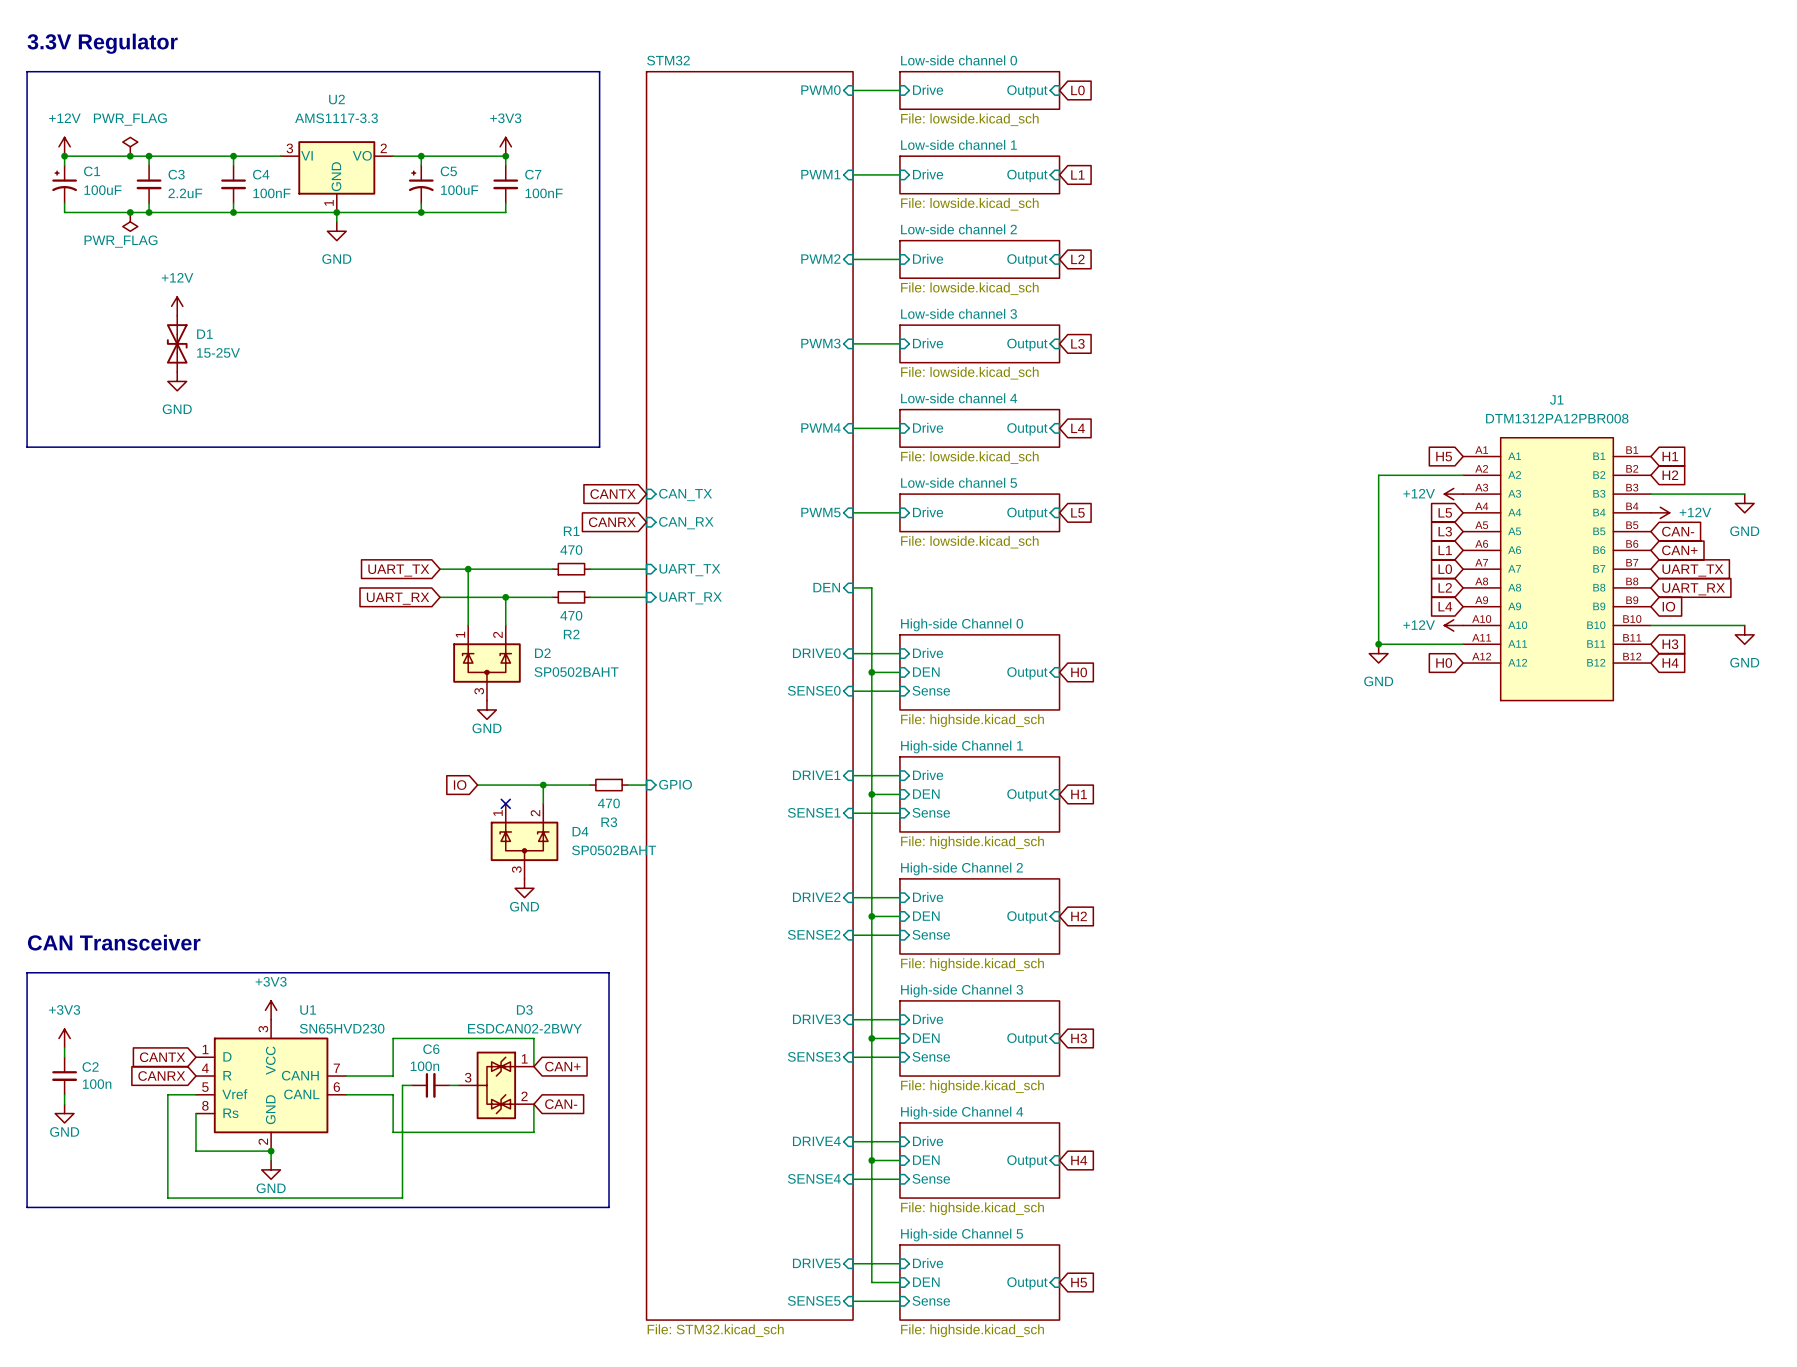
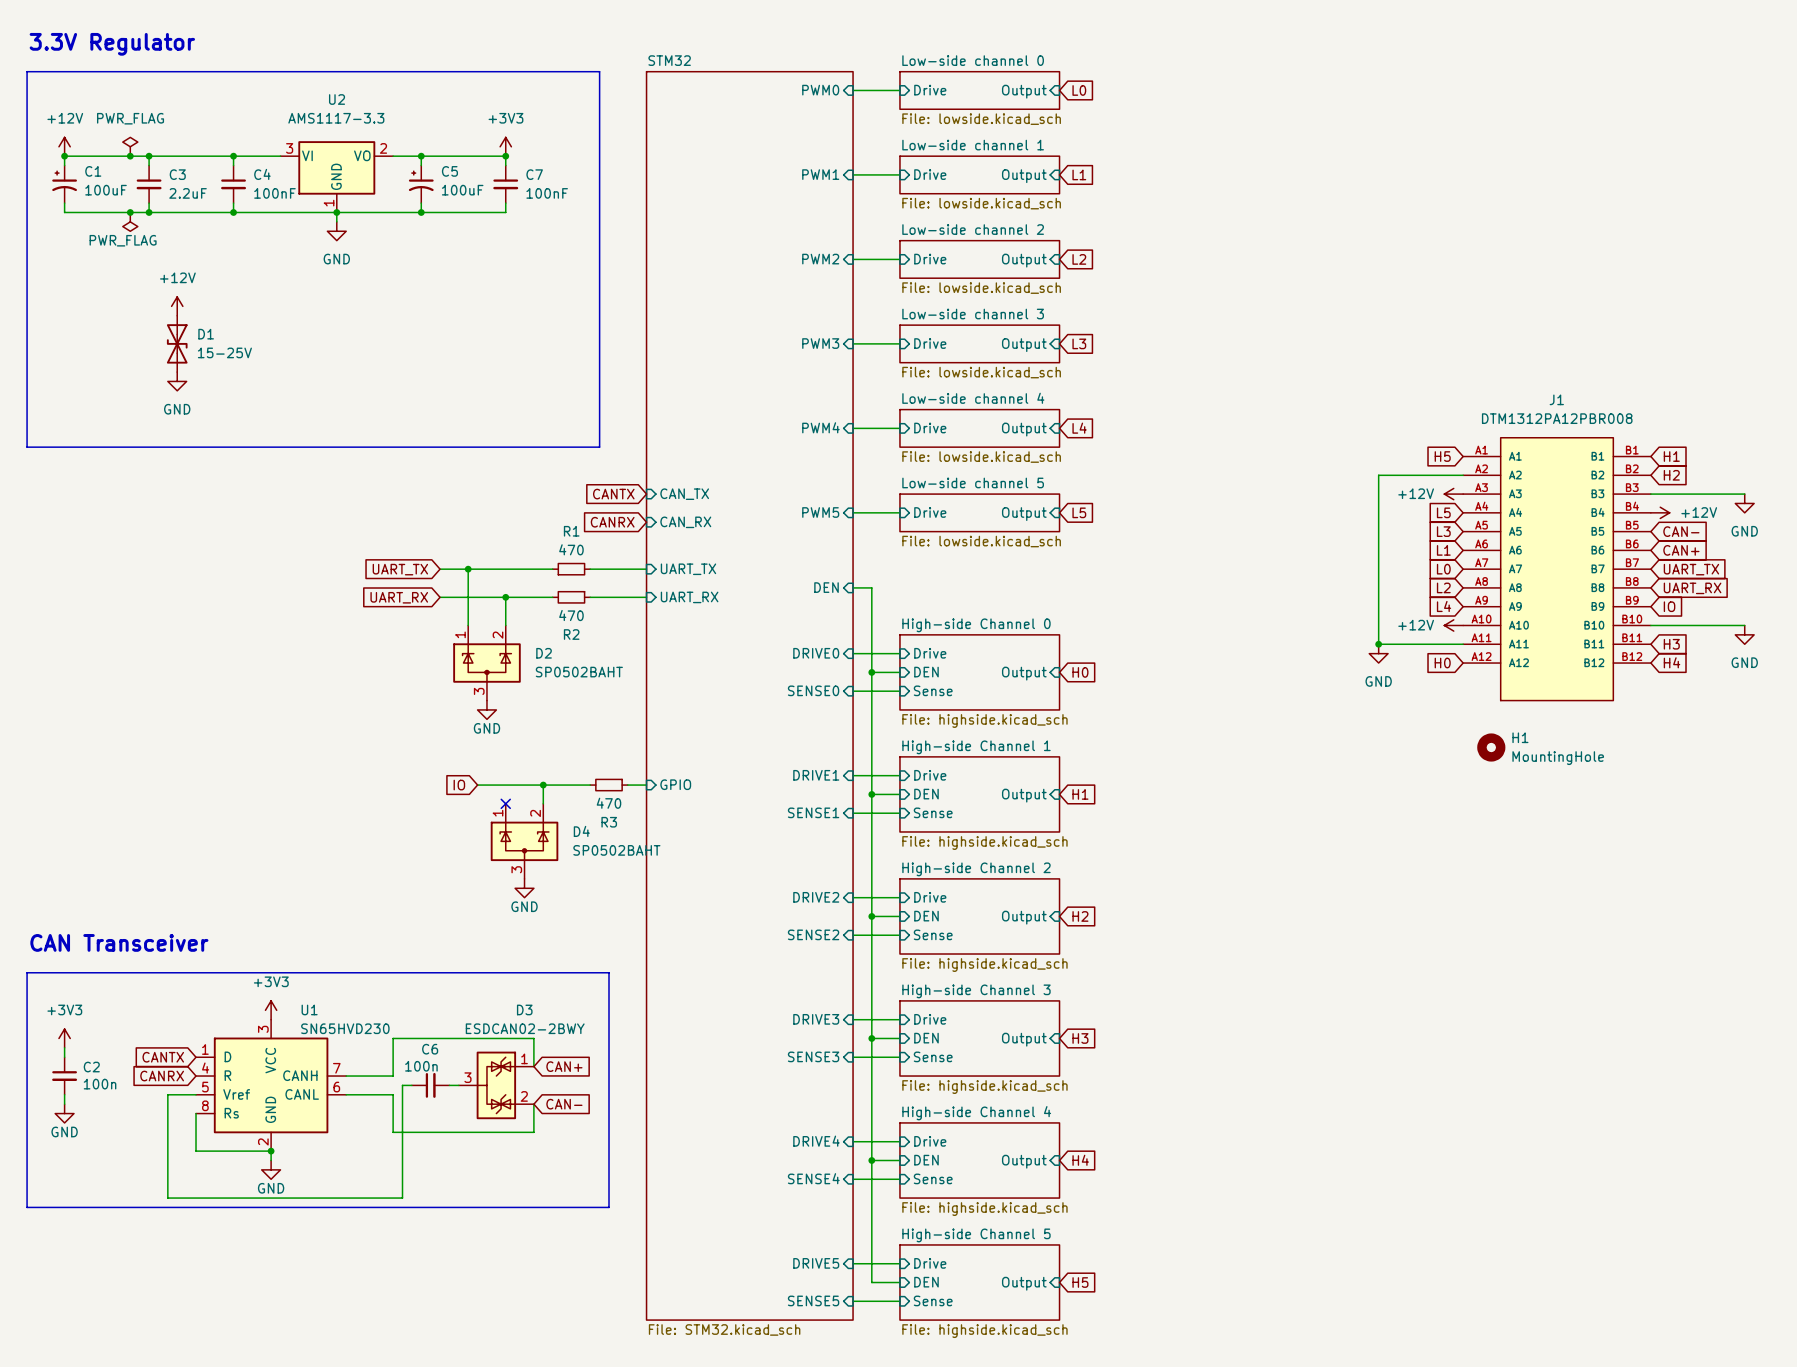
H1: none -> MountingHole (1491, 747)

